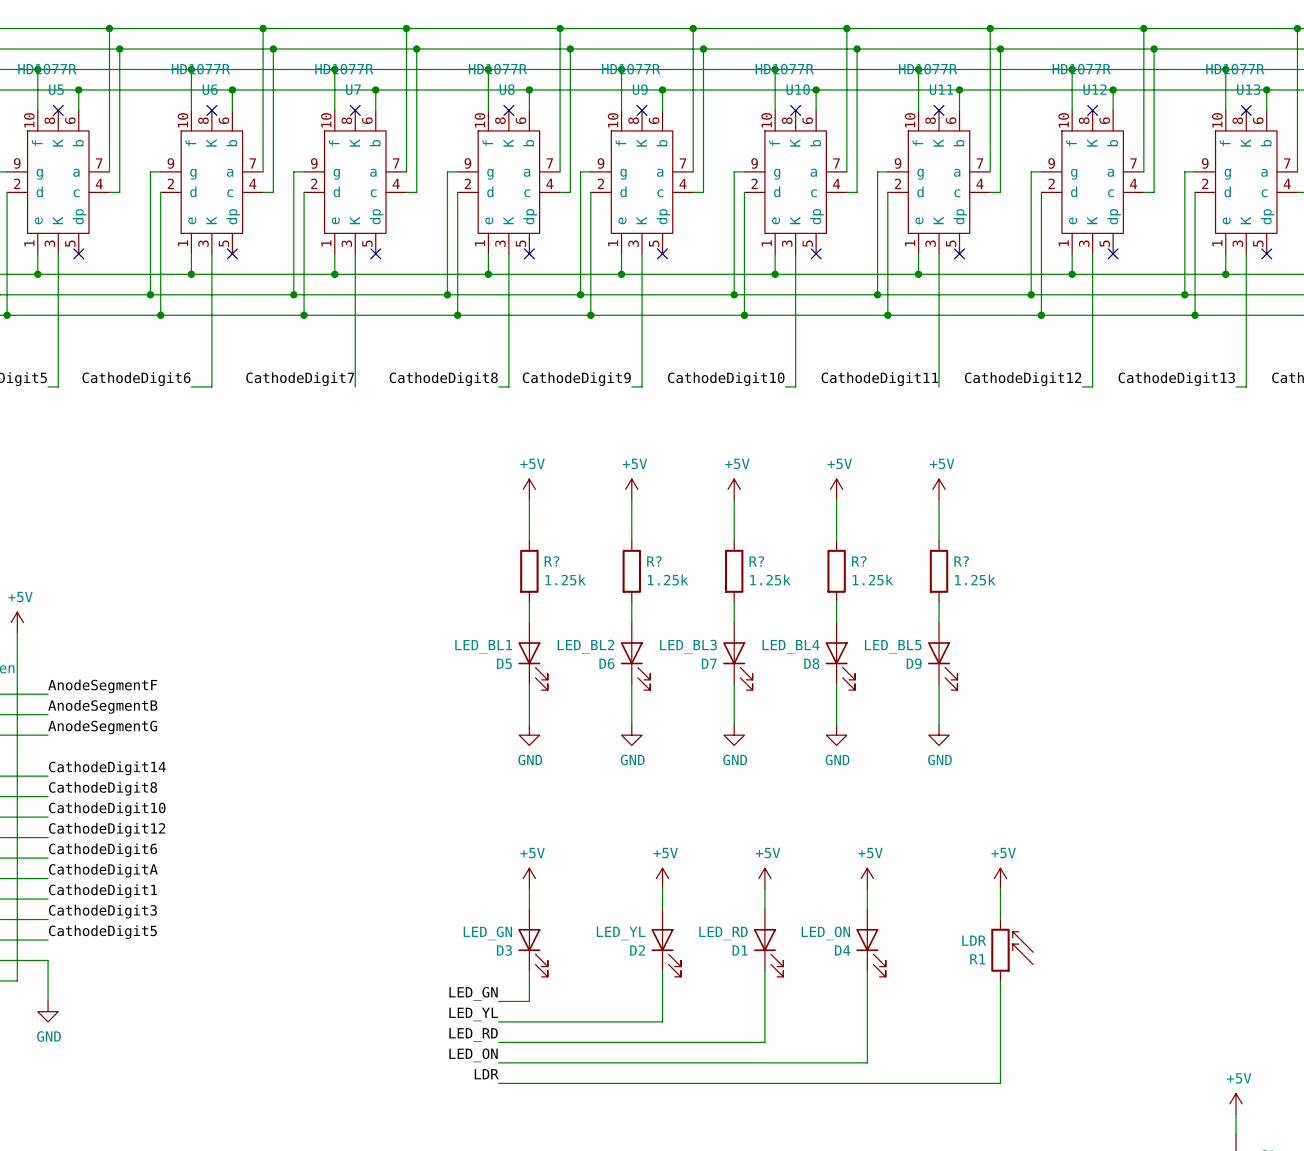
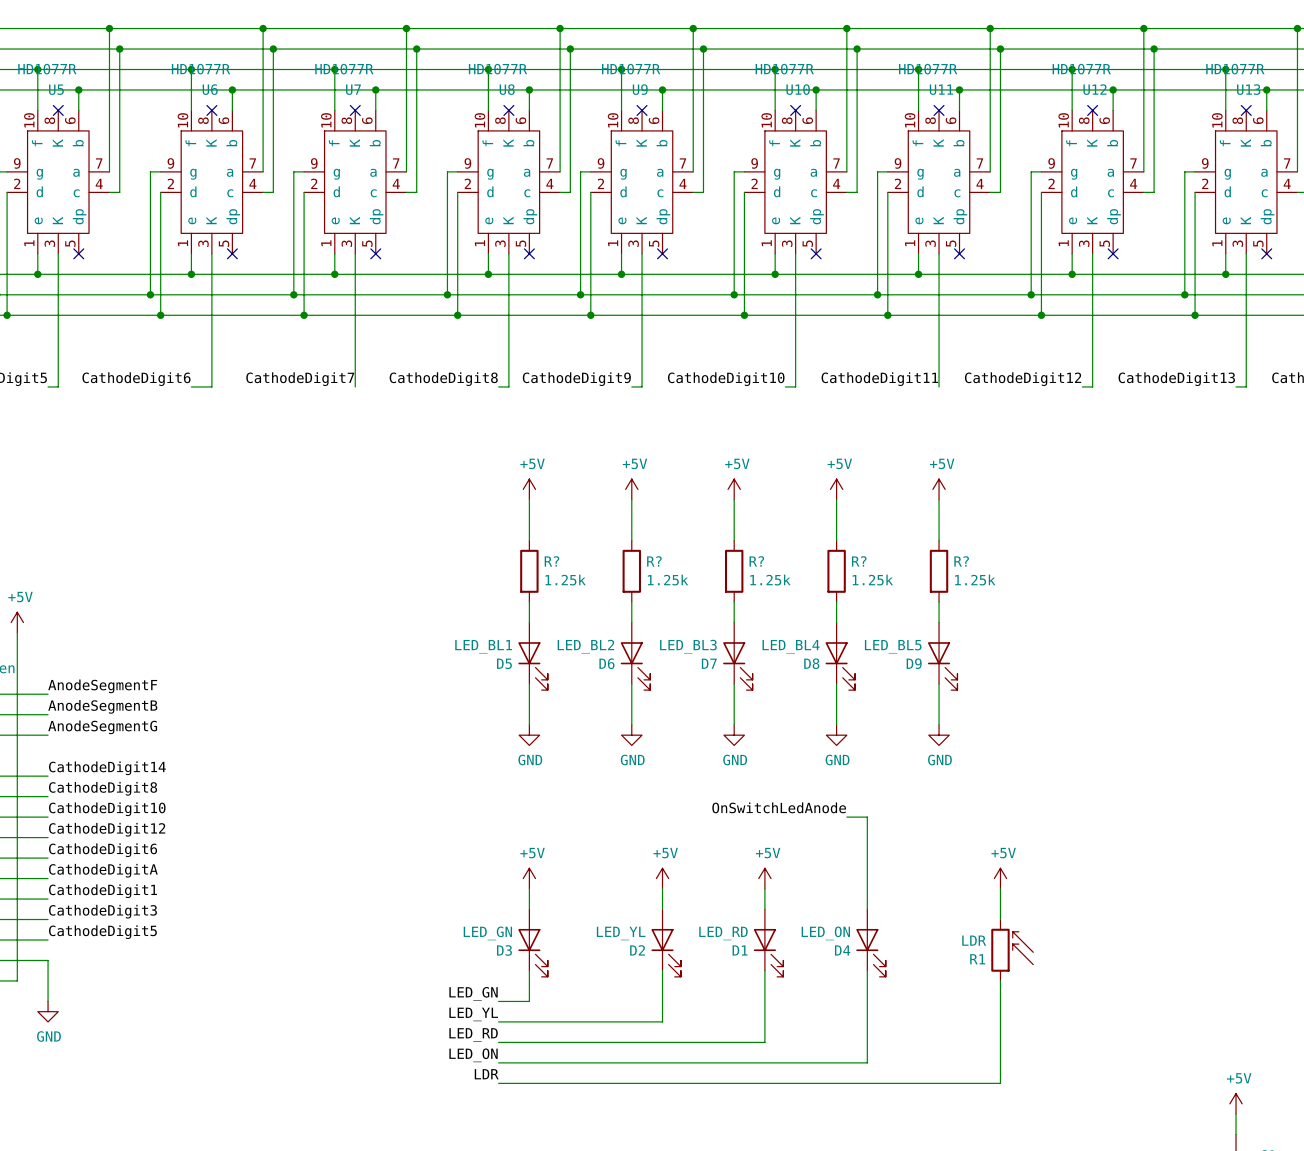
label: none -> OnSwitchLedAnode (779, 807)
wire: none -> (846, 817) (867, 817) (867, 888)
power symbol: +5V (867, 878) -> none

